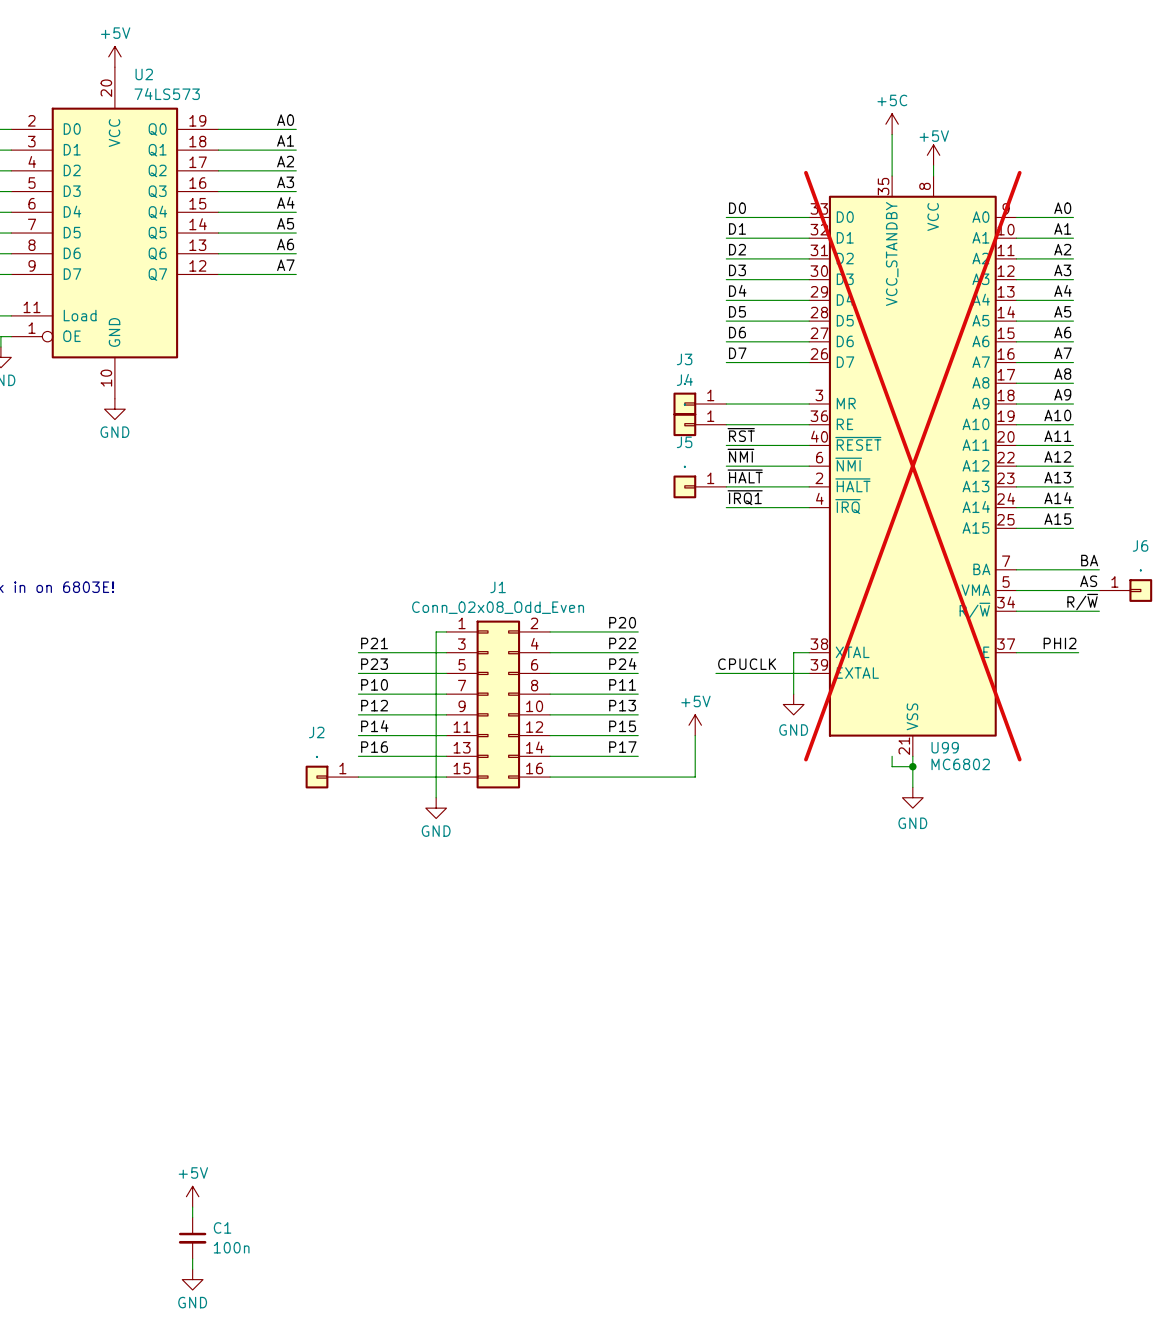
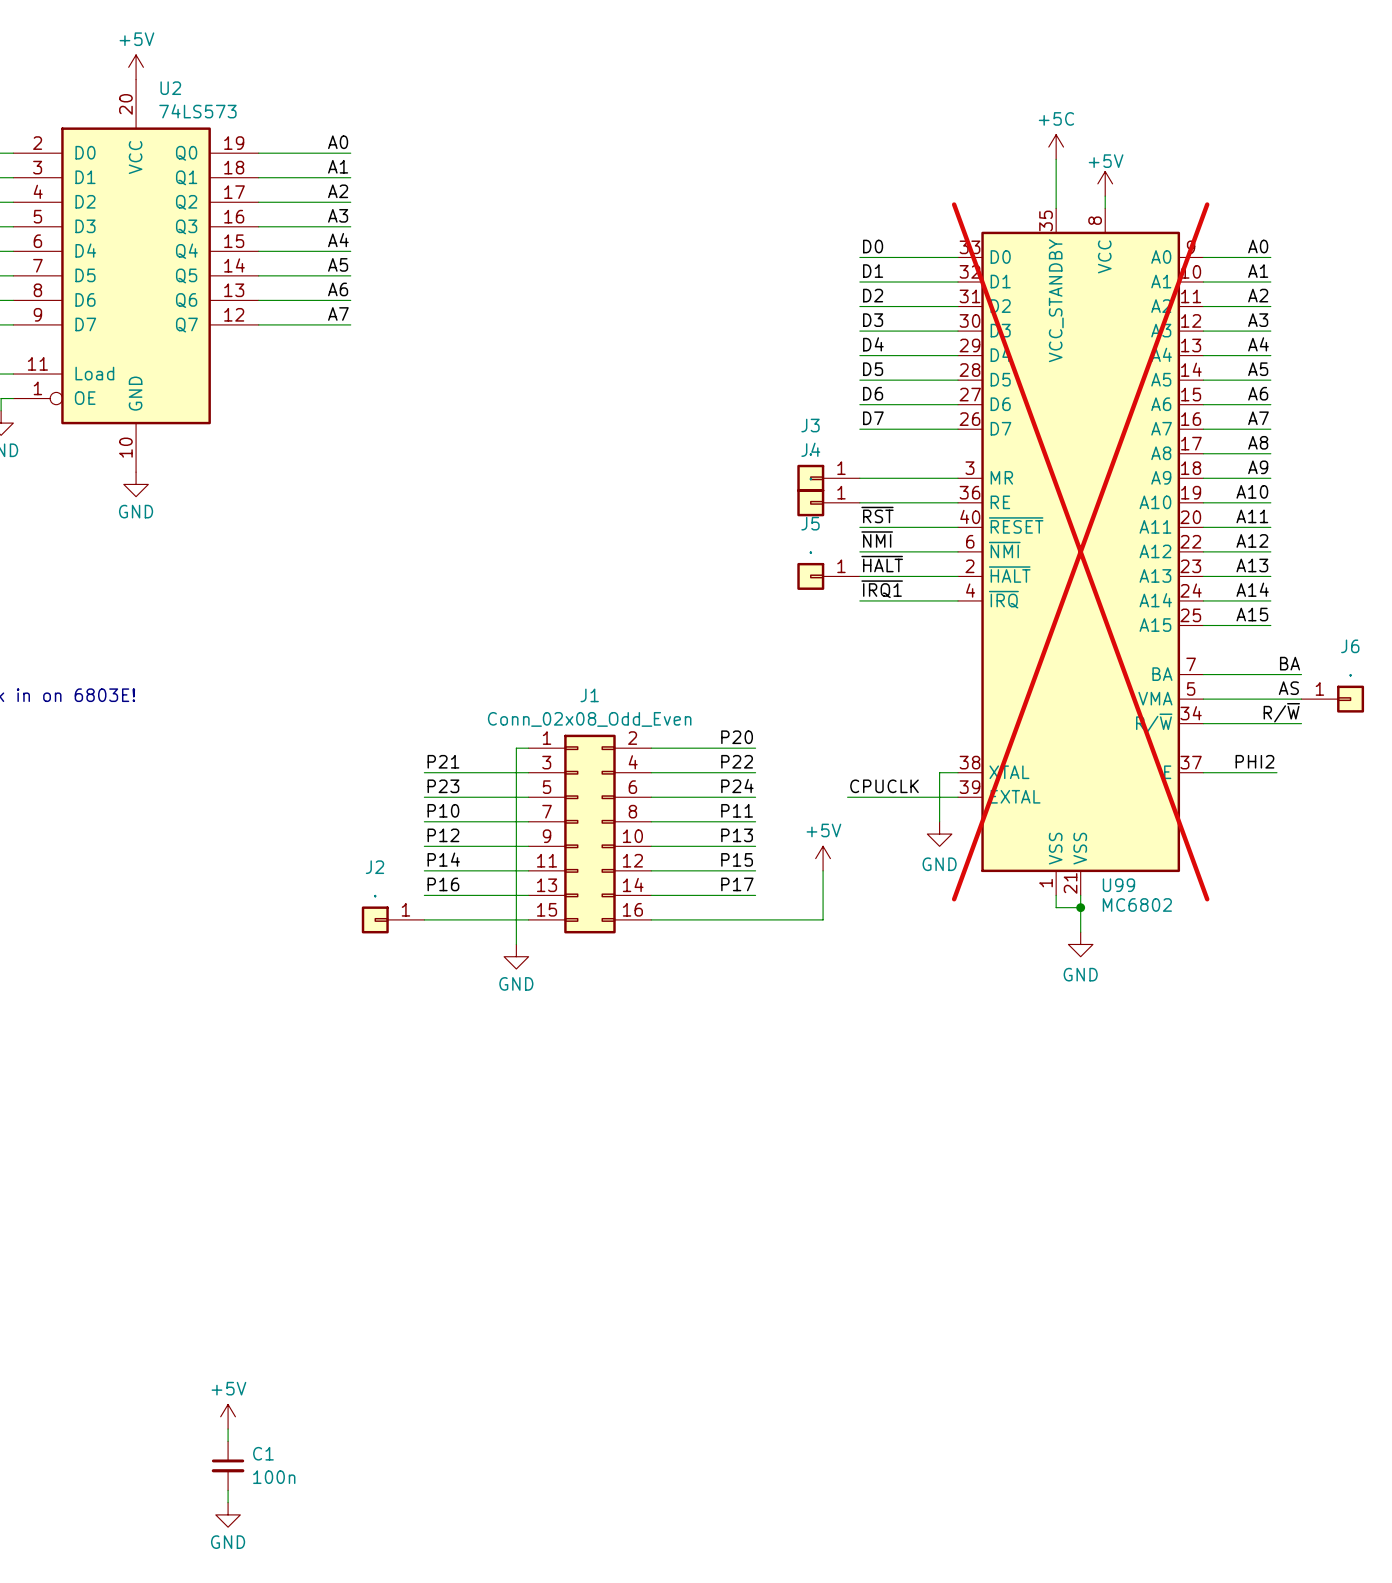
U99 symbol: [809, 176, 1017, 757] -> [958, 208, 1204, 896]

